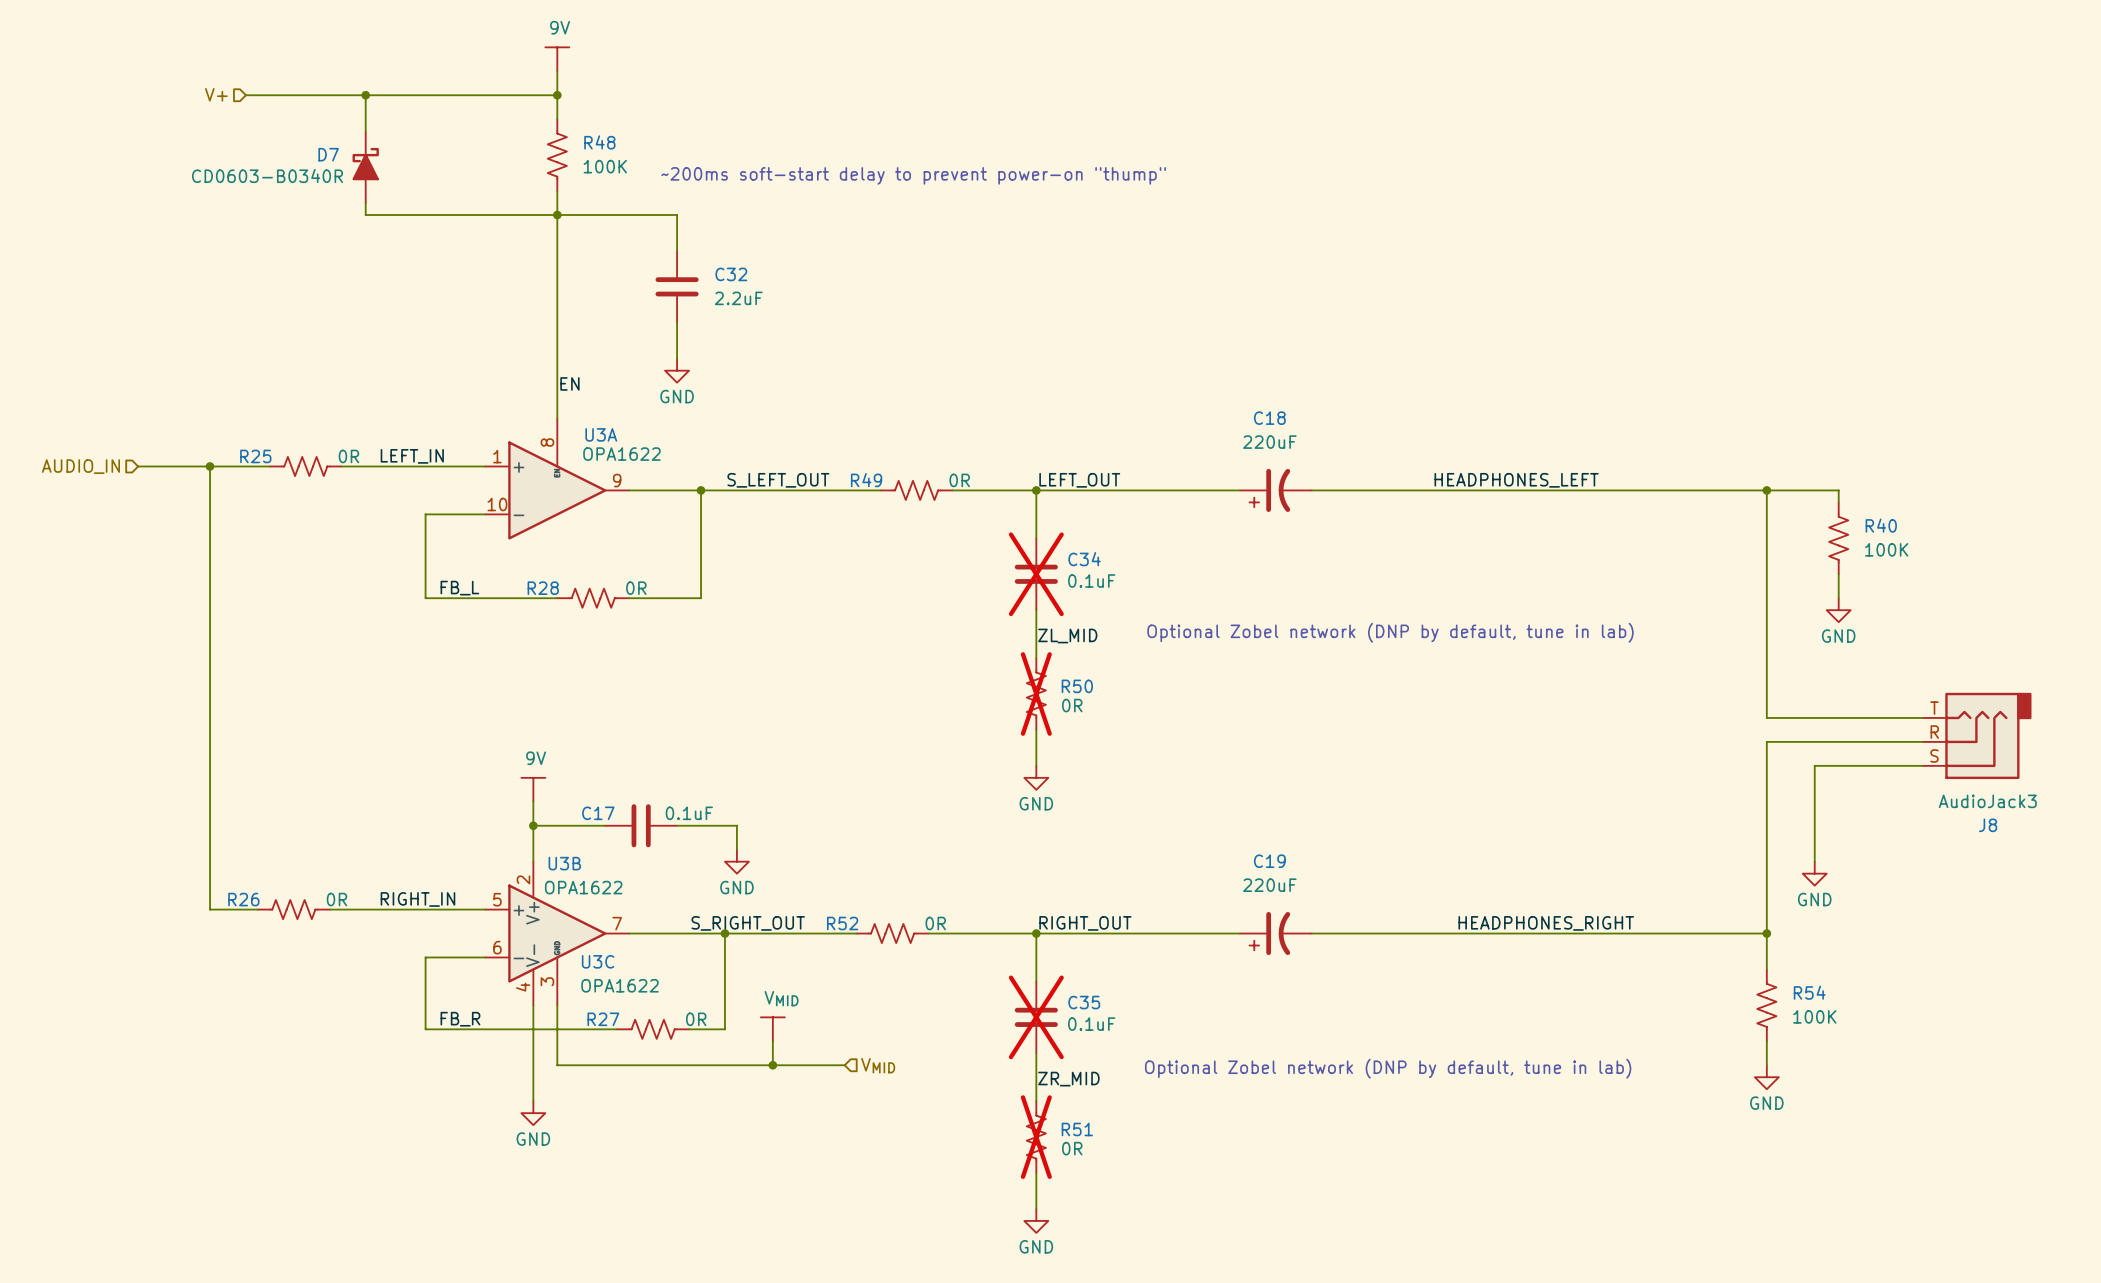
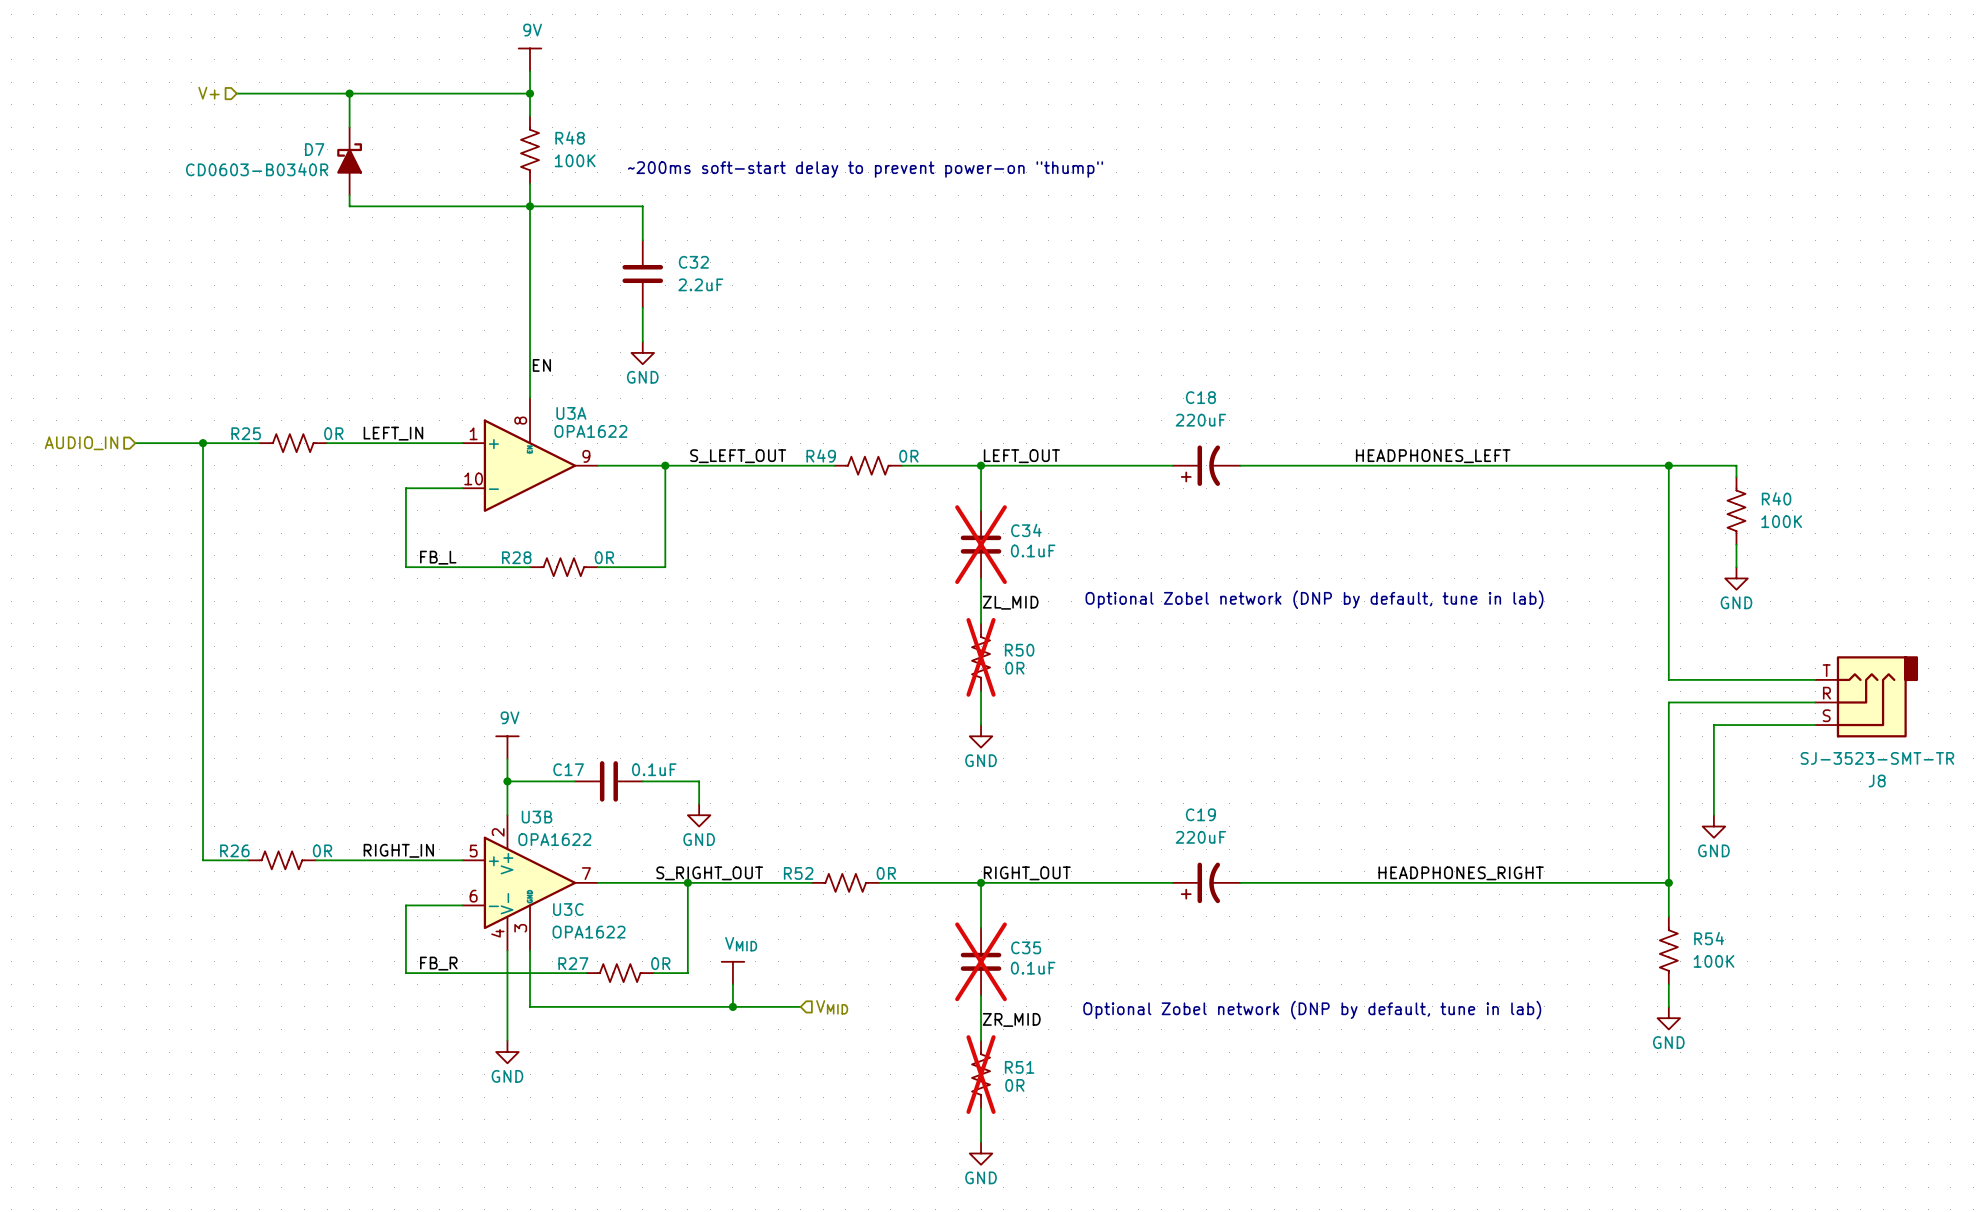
J8 value: AudioJack3 (1987, 801) -> SJ-3523-SMT-TR (1877, 758)

